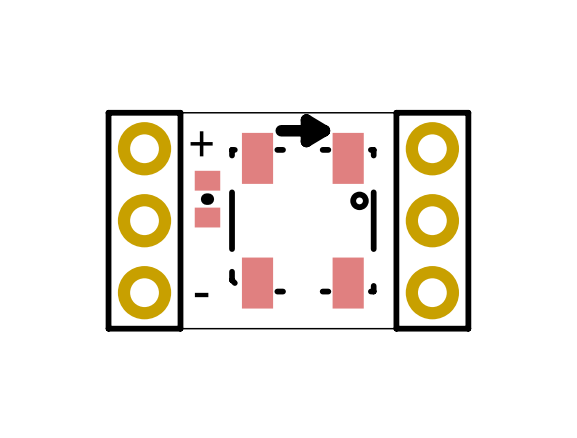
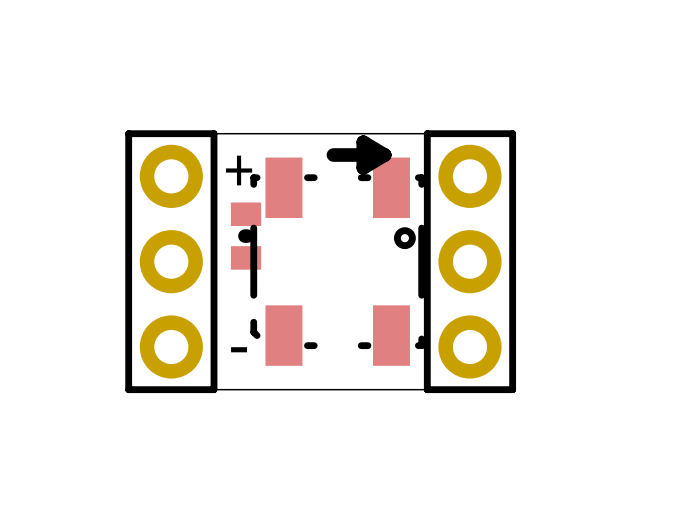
part position: (302, 220) -> (337, 261)
part position: (432, 220) -> (469, 261)

